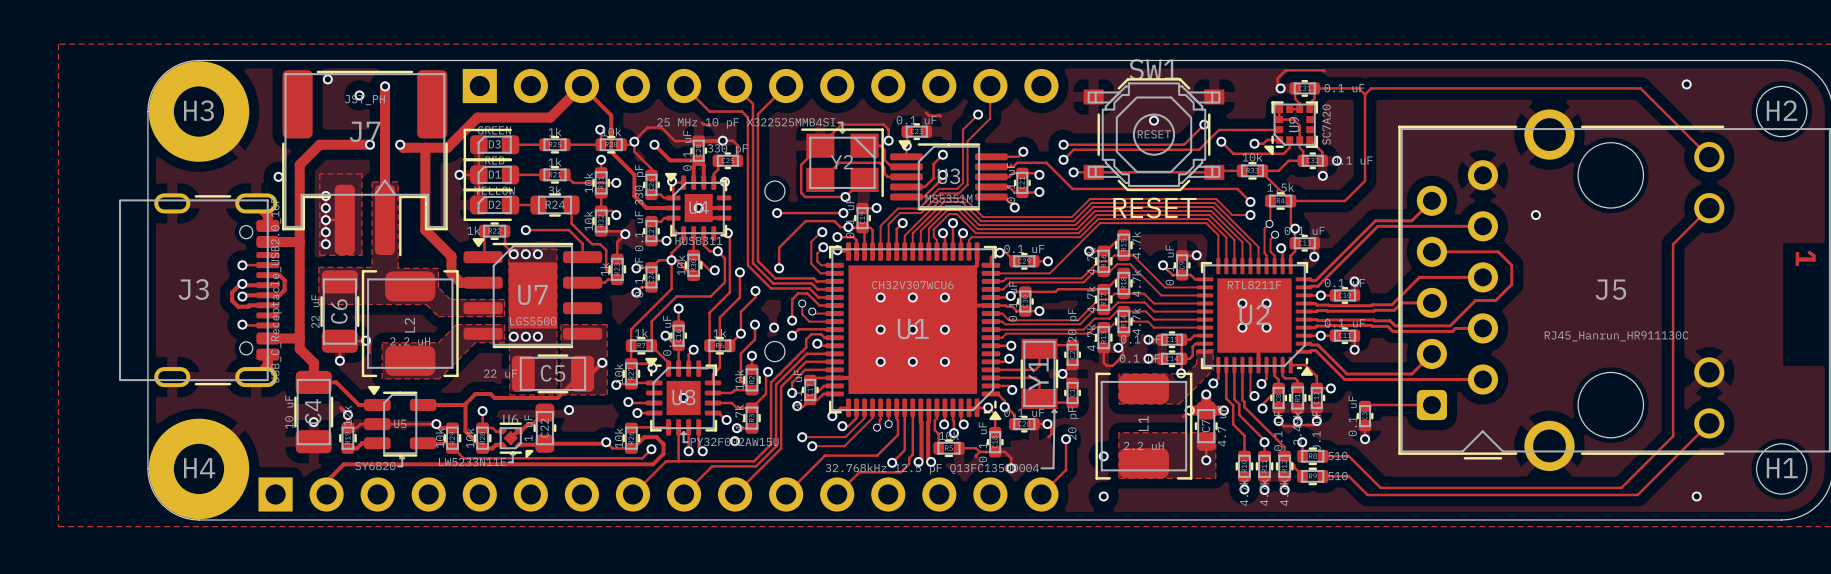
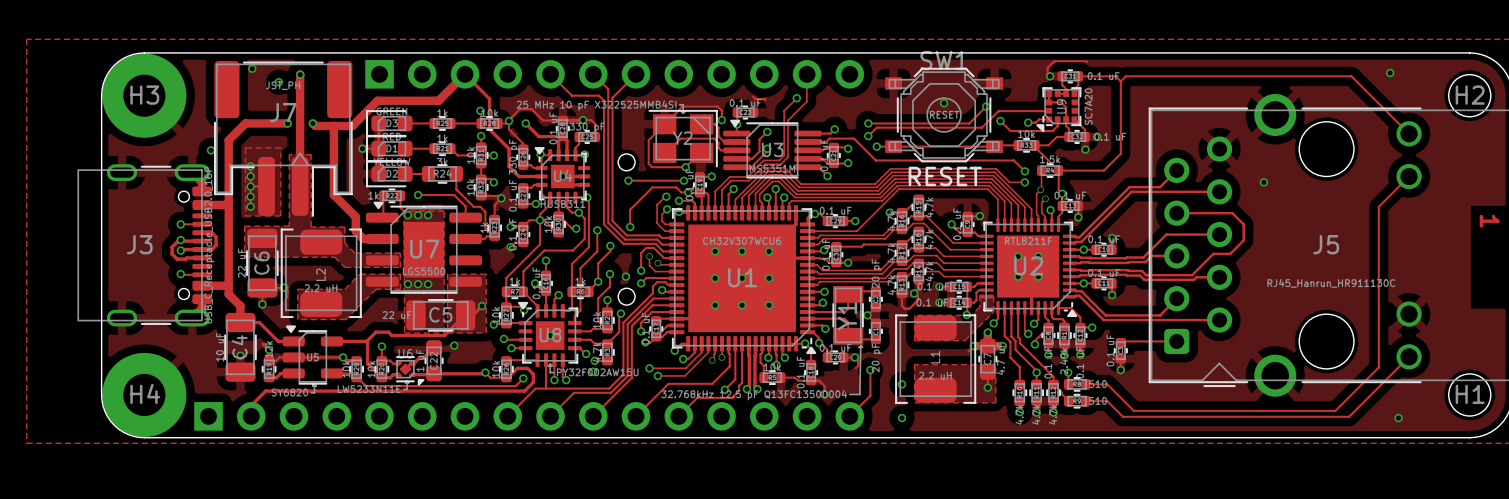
track: (1278, 421) (1283, 426) (1293, 426) (1297, 421) (1300, 425) (1312, 425) (1316, 421) -> none
track: (979, 451) (976, 457) -> none

